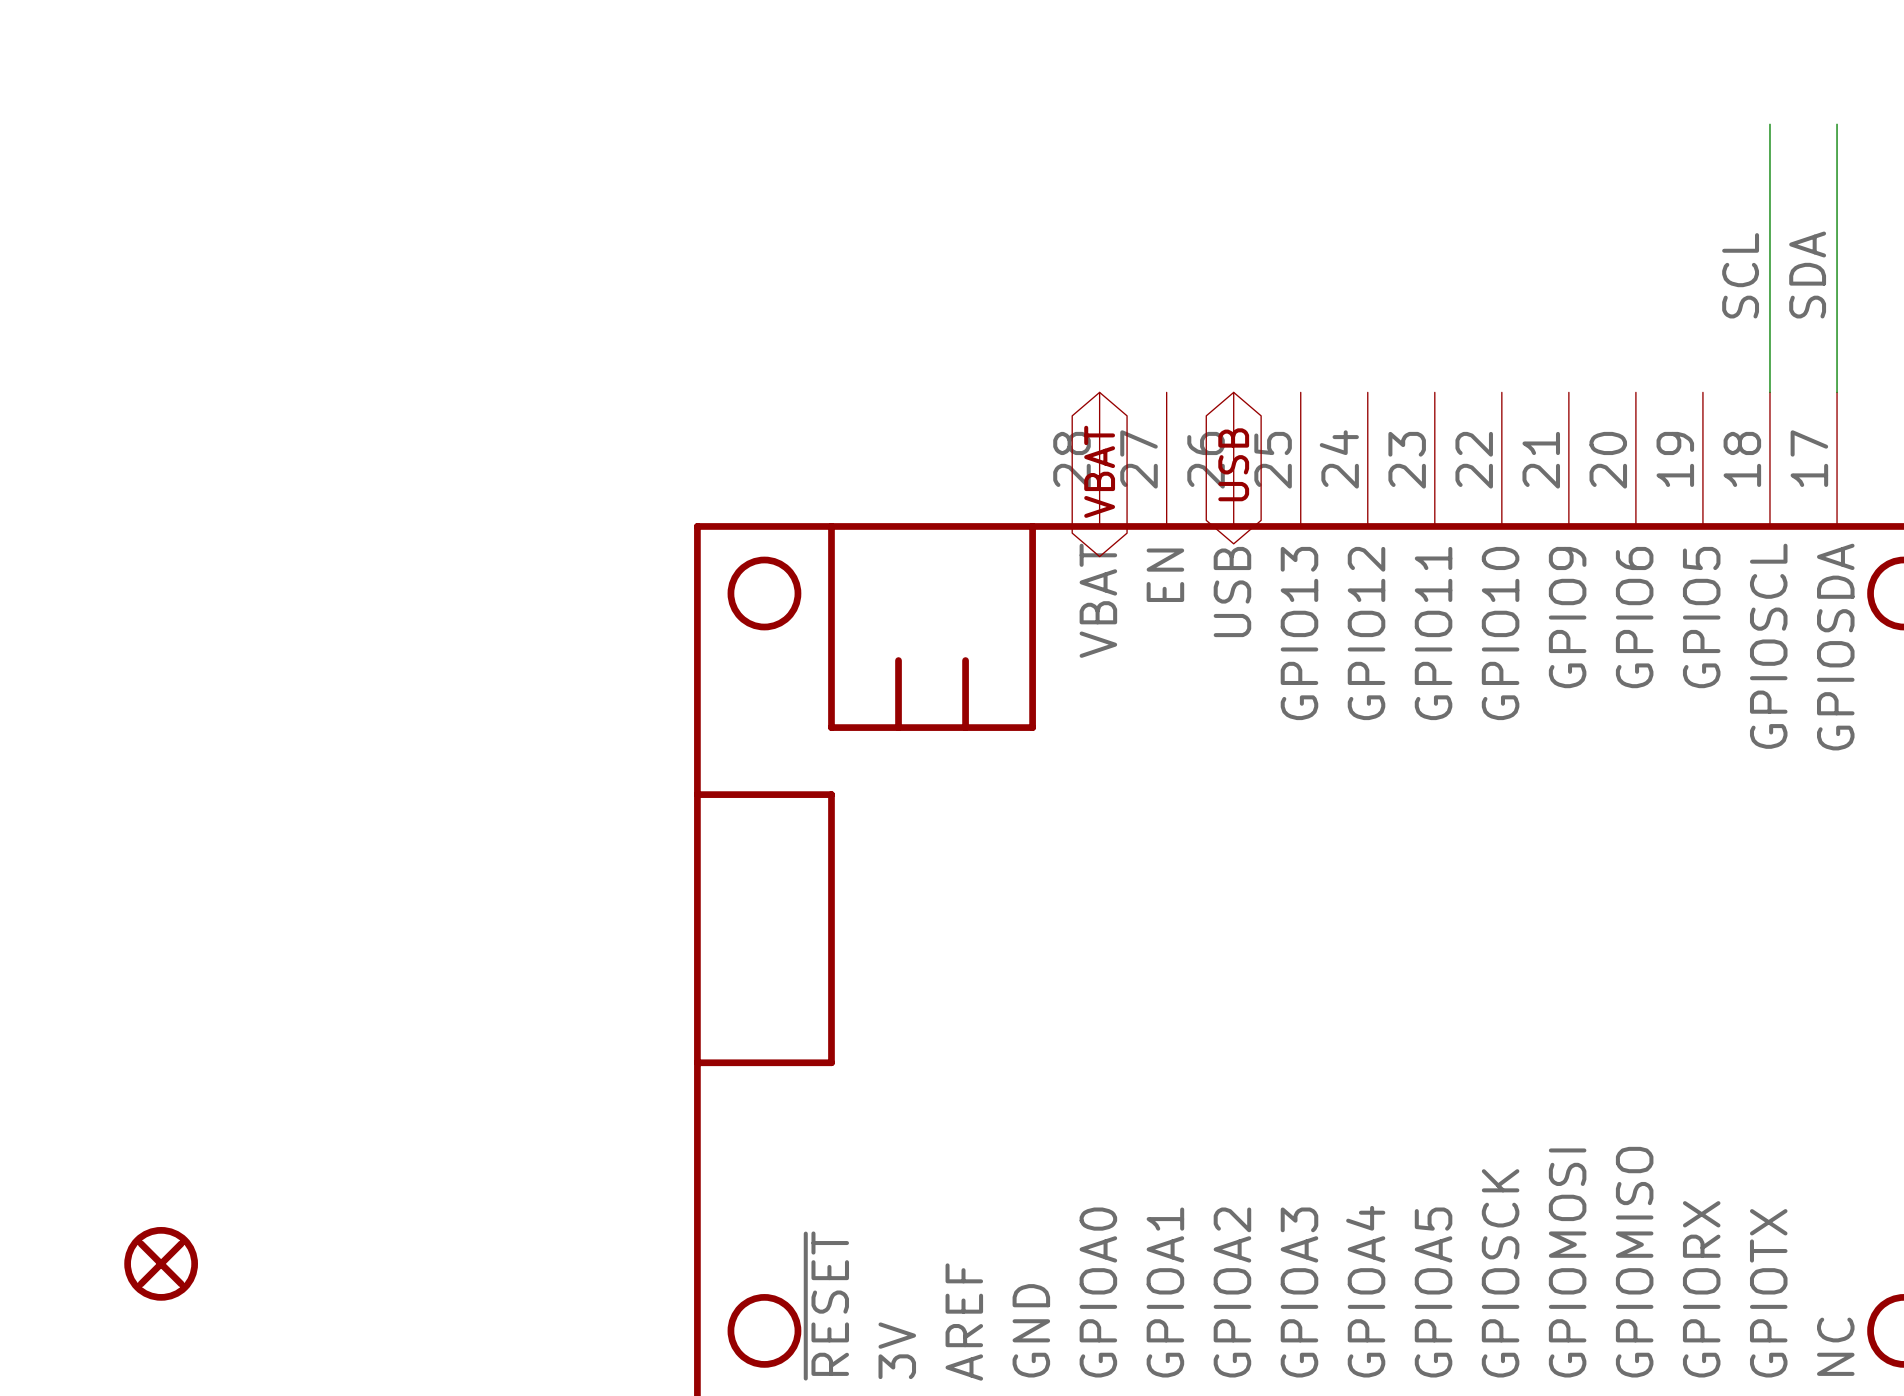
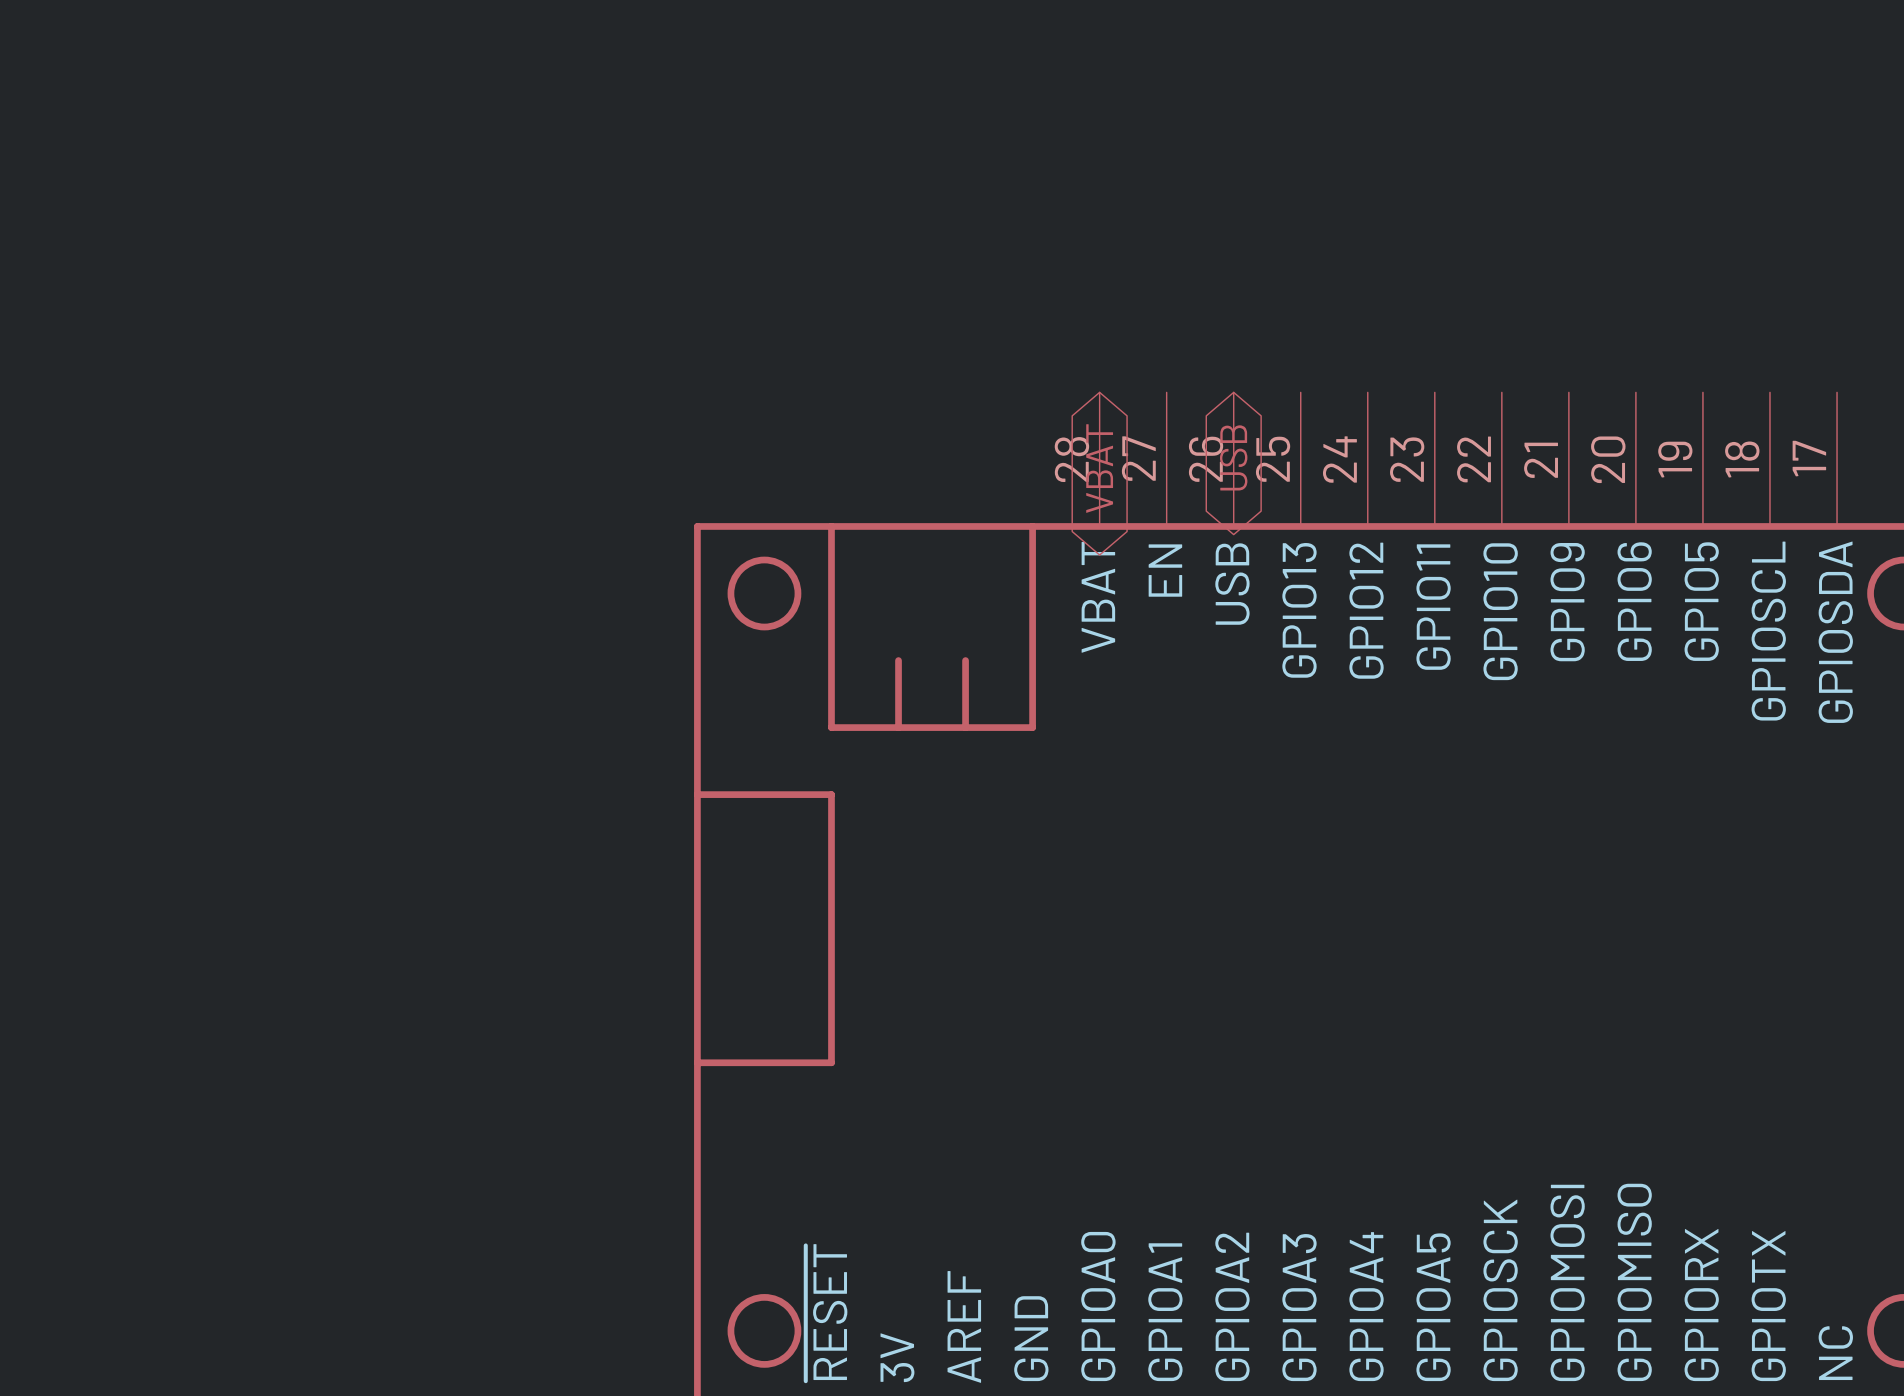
wire: (1769, 124) (1769, 392) -> none
wire: (1837, 124) (1837, 392) -> none
label: SCL (1740, 275) -> none
label: SDA (1807, 275) -> none
part: (161, 1263) -> none

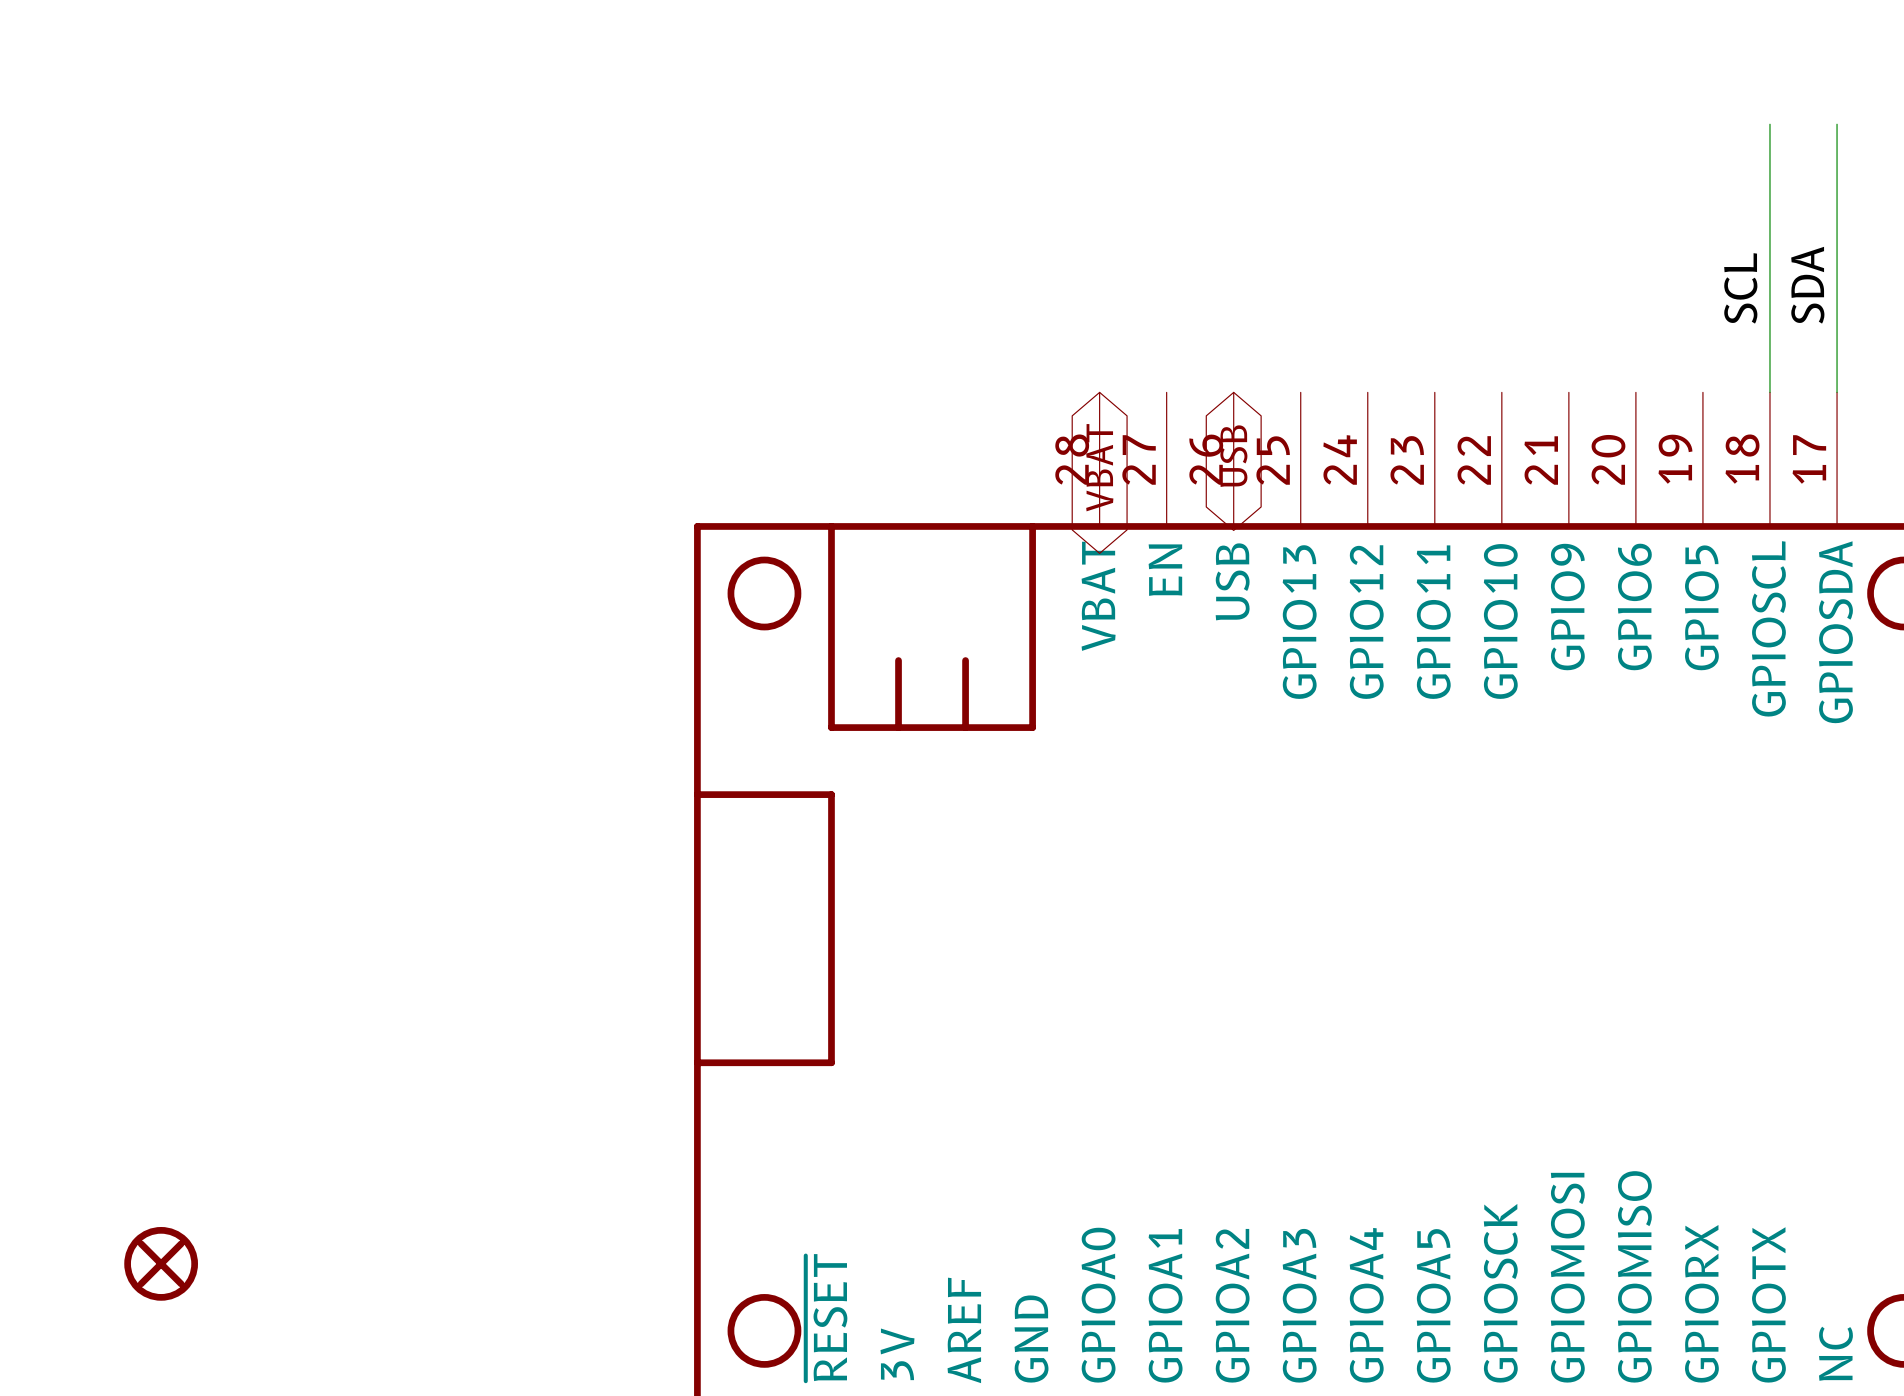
wire: none -> (1769, 124) (1769, 392)
wire: none -> (1837, 124) (1837, 392)
label: none -> SDA (1807, 285)
label: none -> SCL (1740, 288)
part: none -> (161, 1263)

